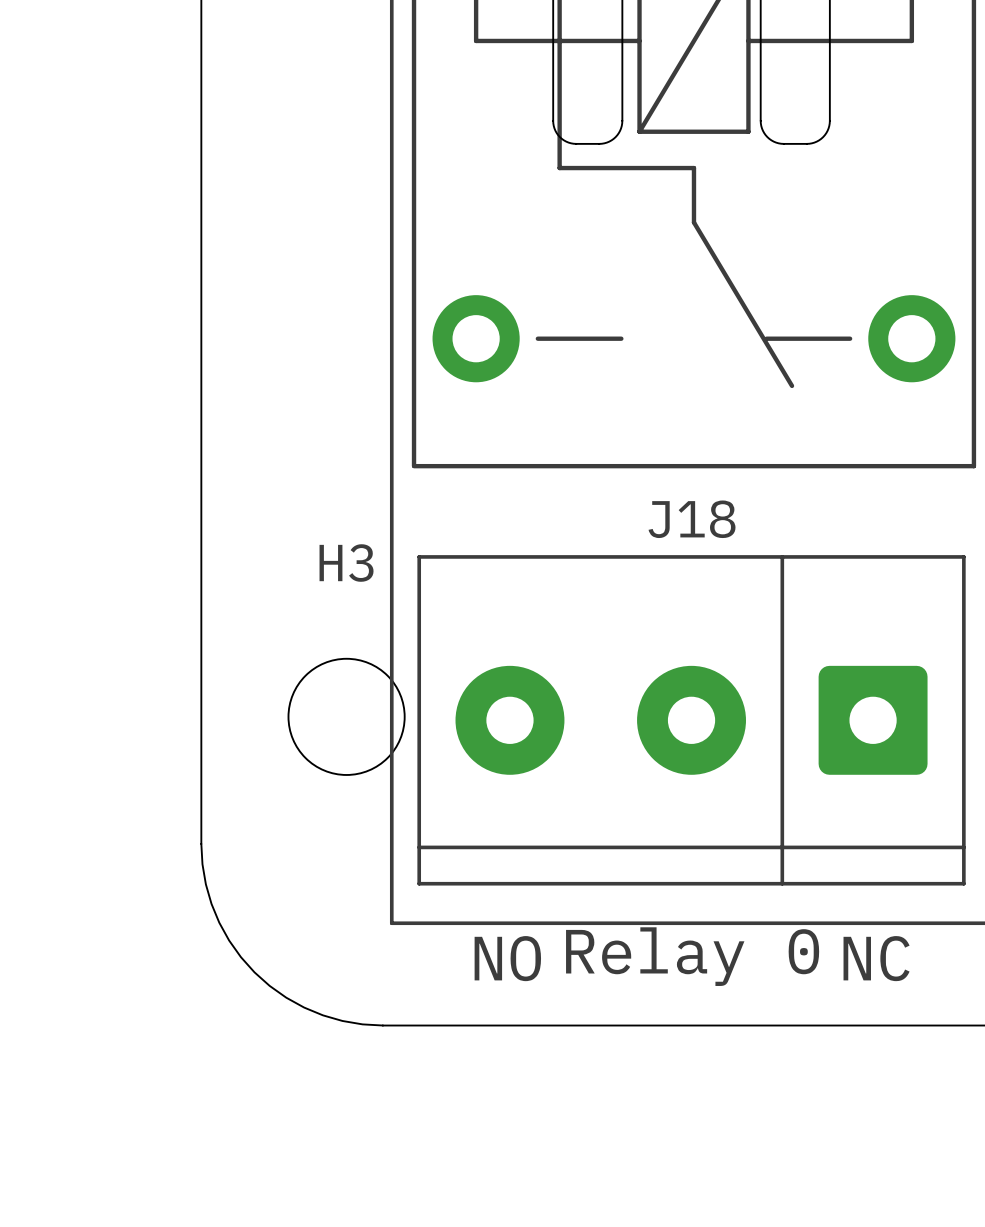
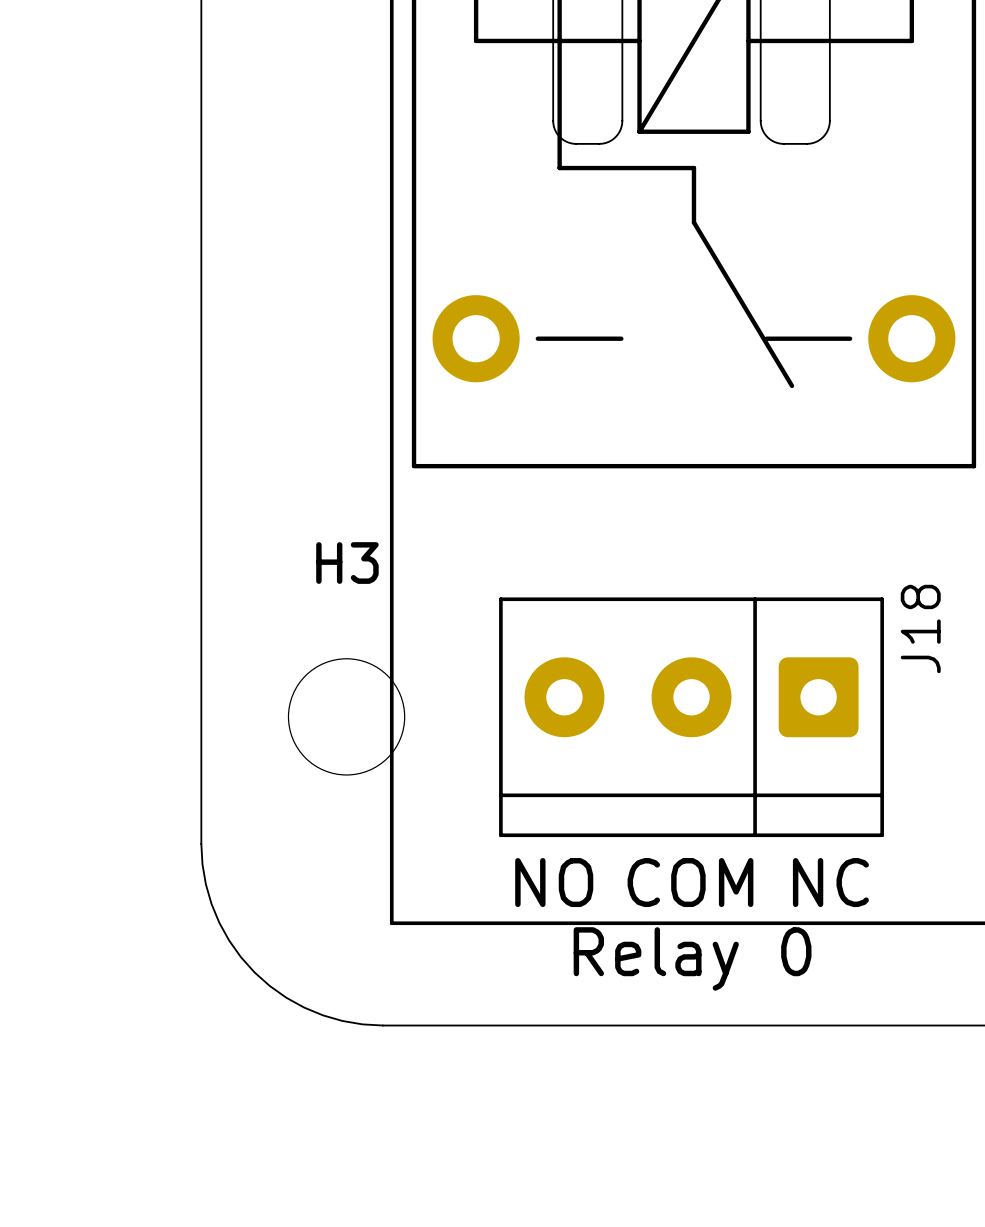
J18 name position: J18 (692, 519) -> J18 (920, 628)
J18 footprint: [417, 555, 966, 886] -> [499, 597, 884, 838]
text: none -> COM (690, 882)
text position: NO (507, 958) -> NO (554, 882)
text position: NC (876, 958) -> NC (830, 882)

